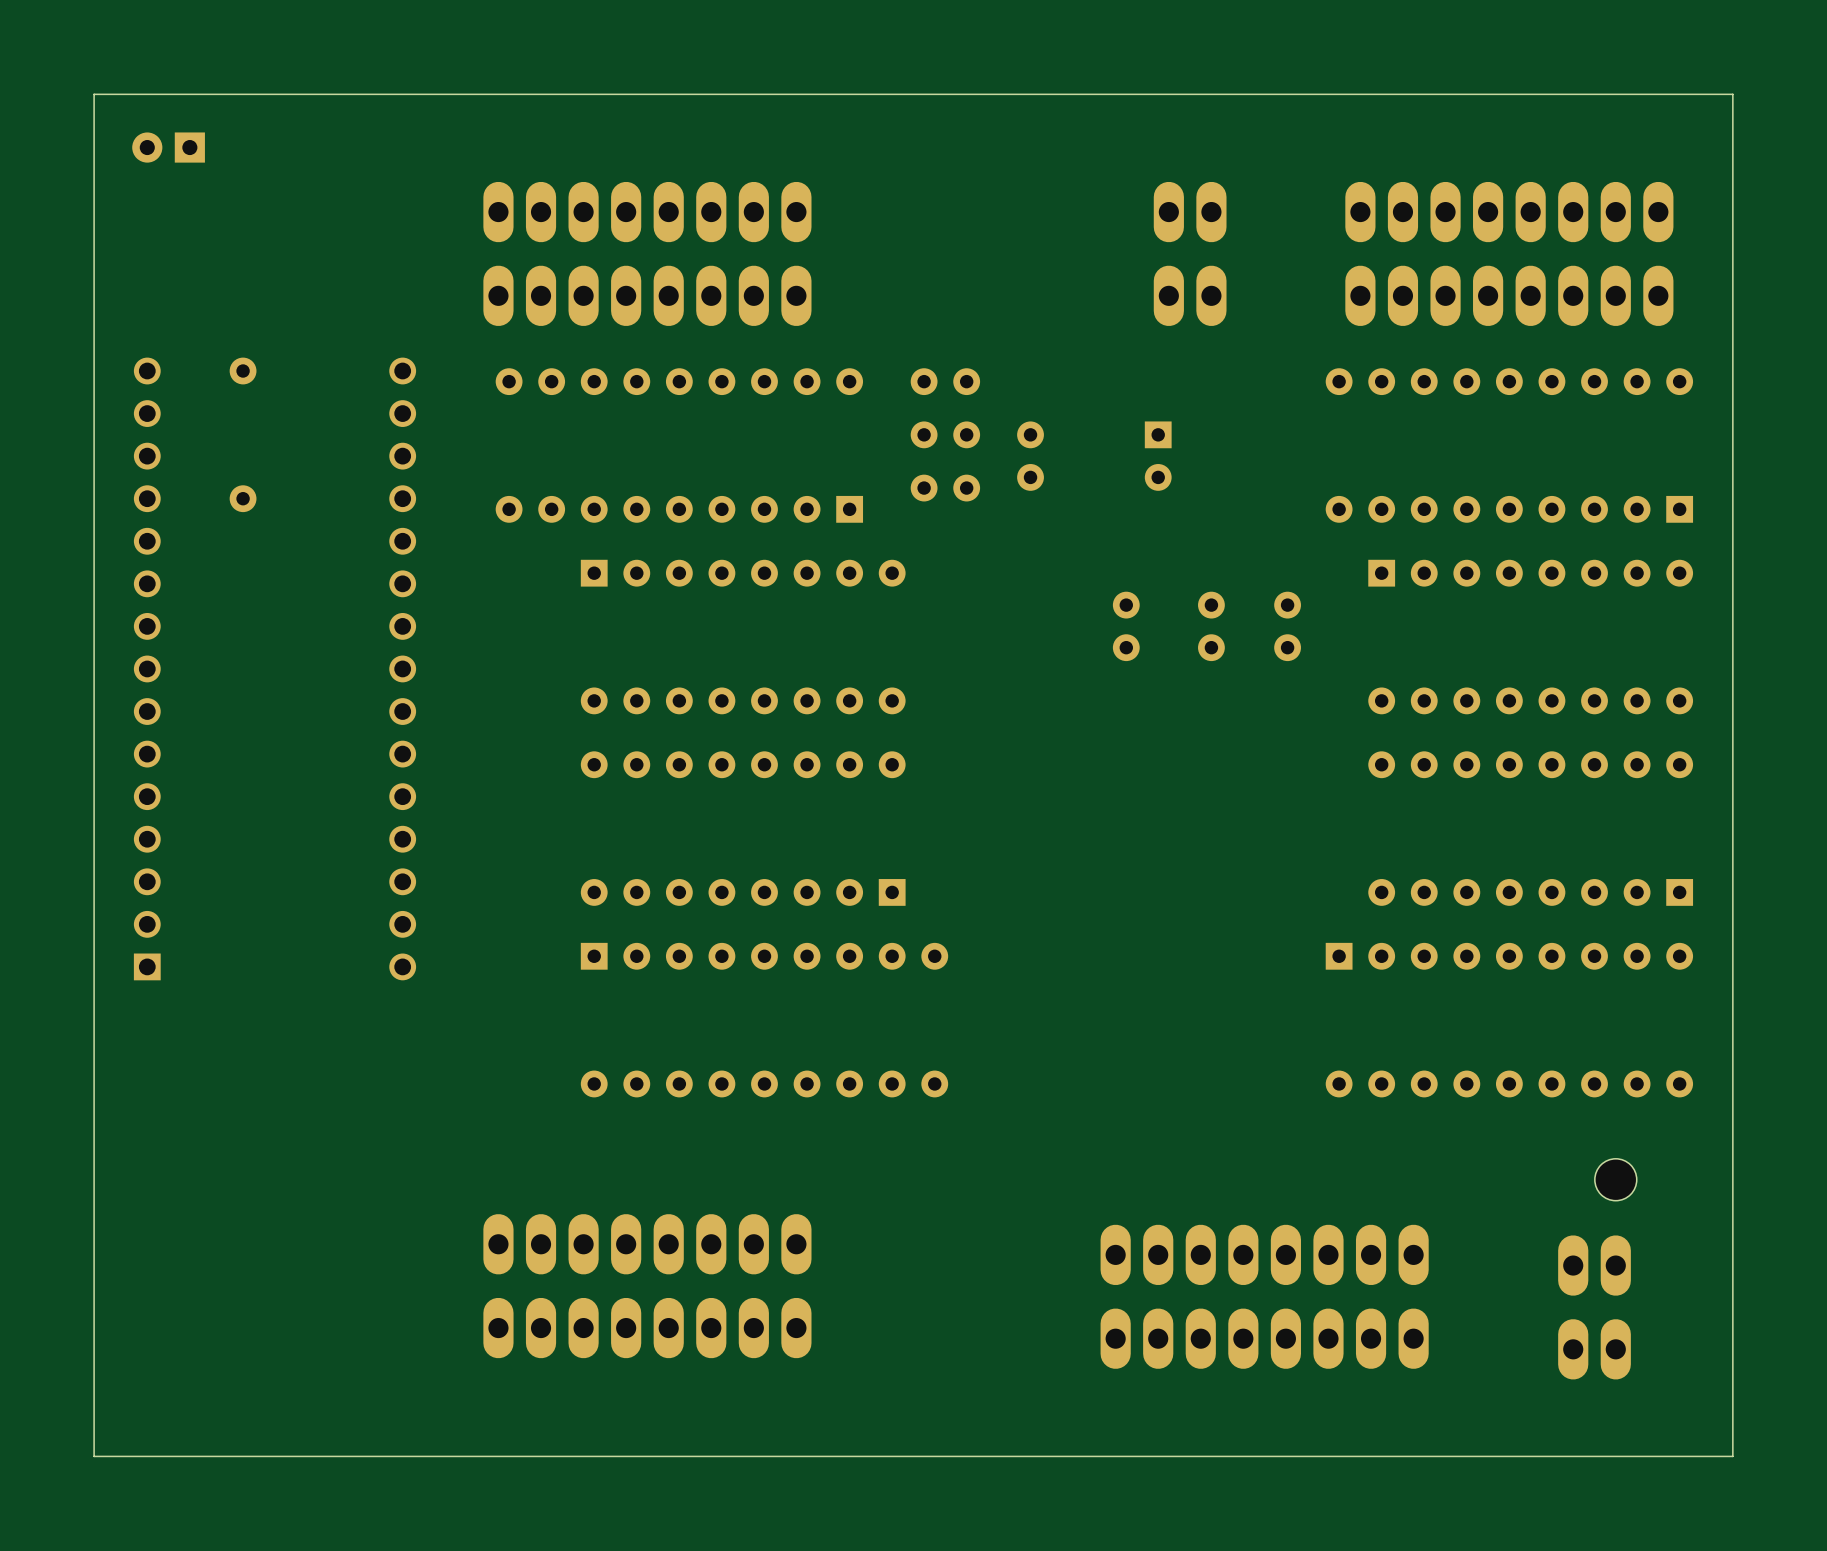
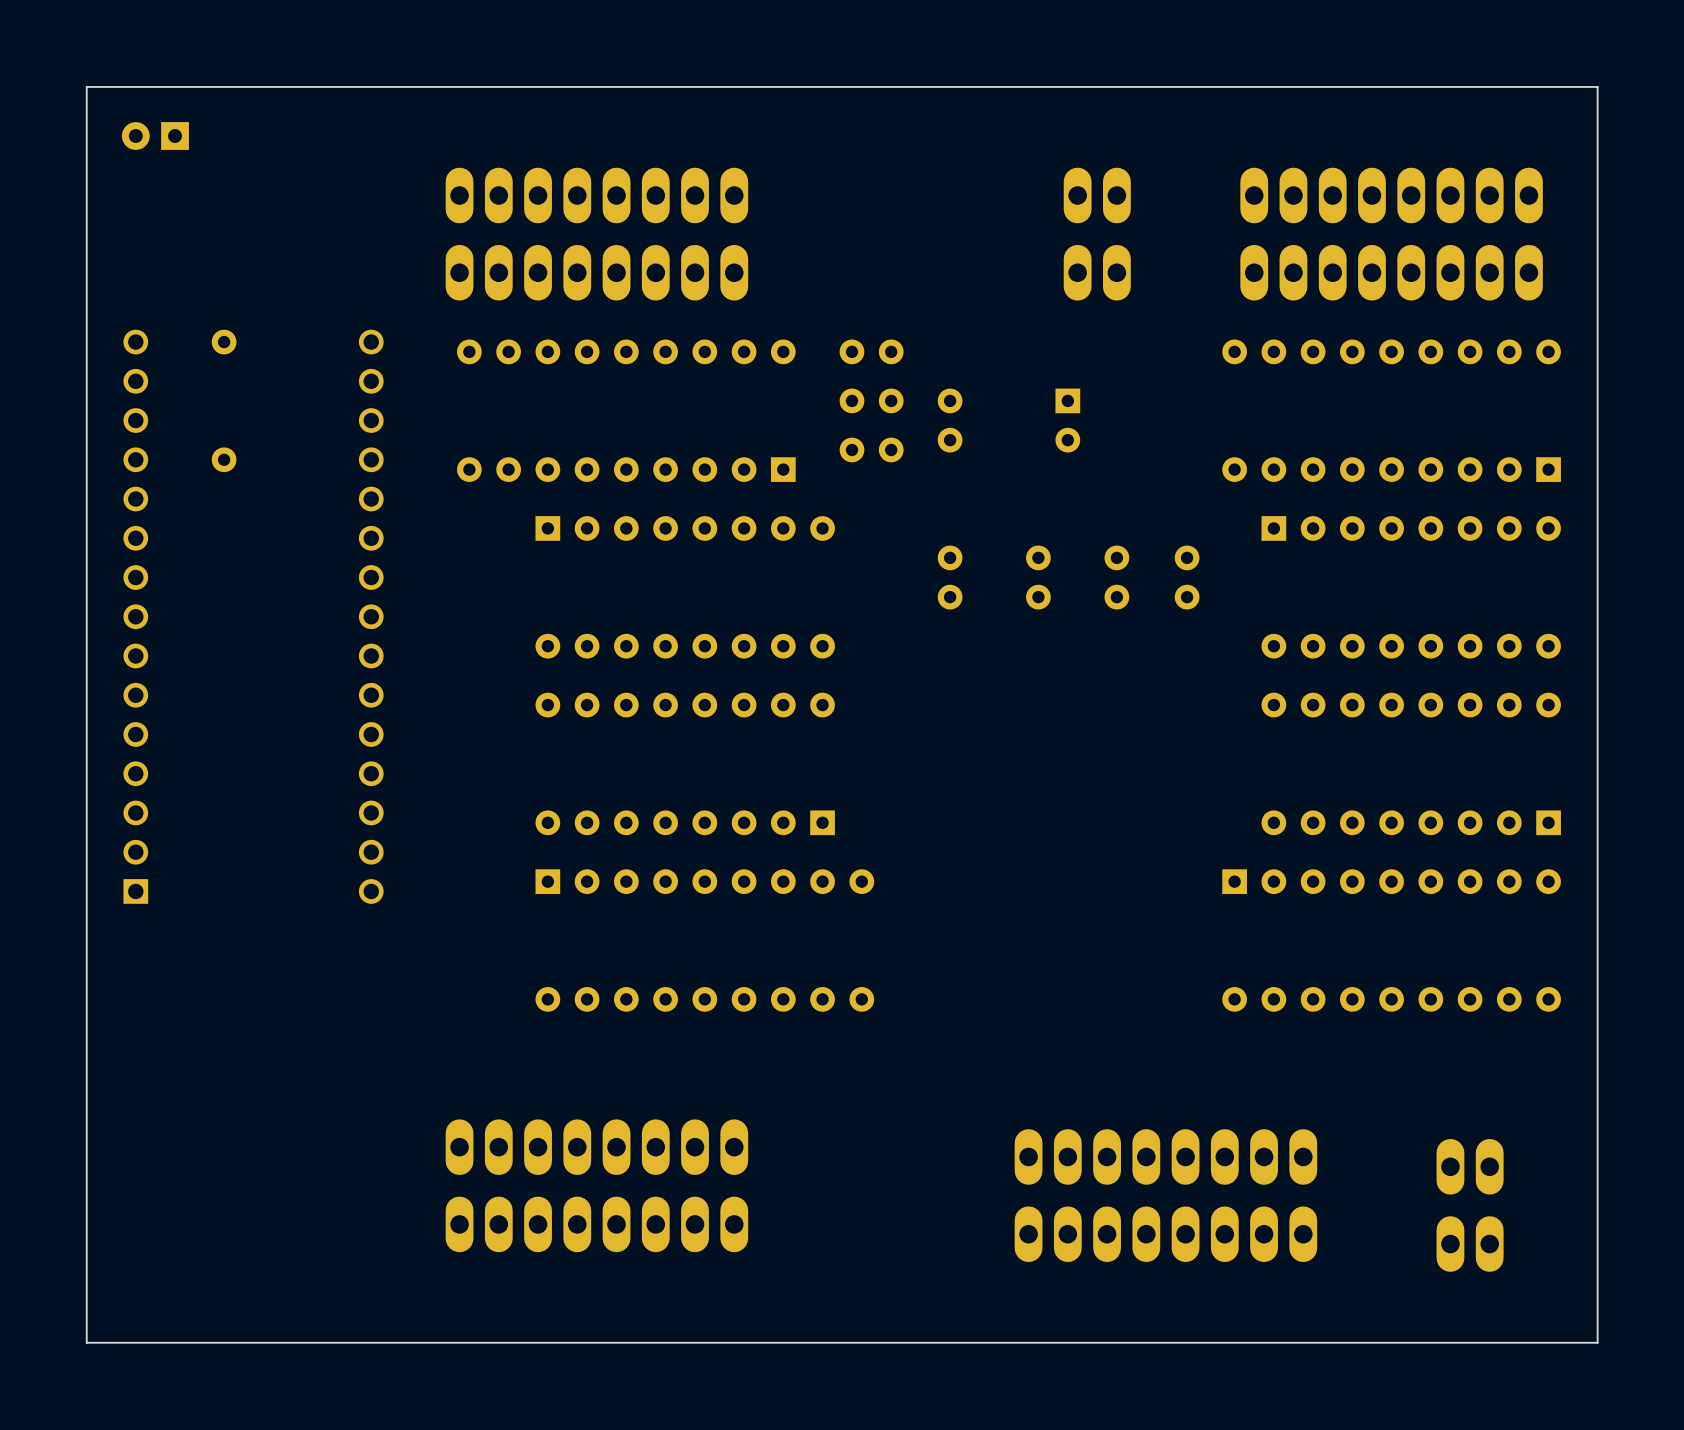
part: none -> (950, 577)
part: (1615, 1179) -> none

